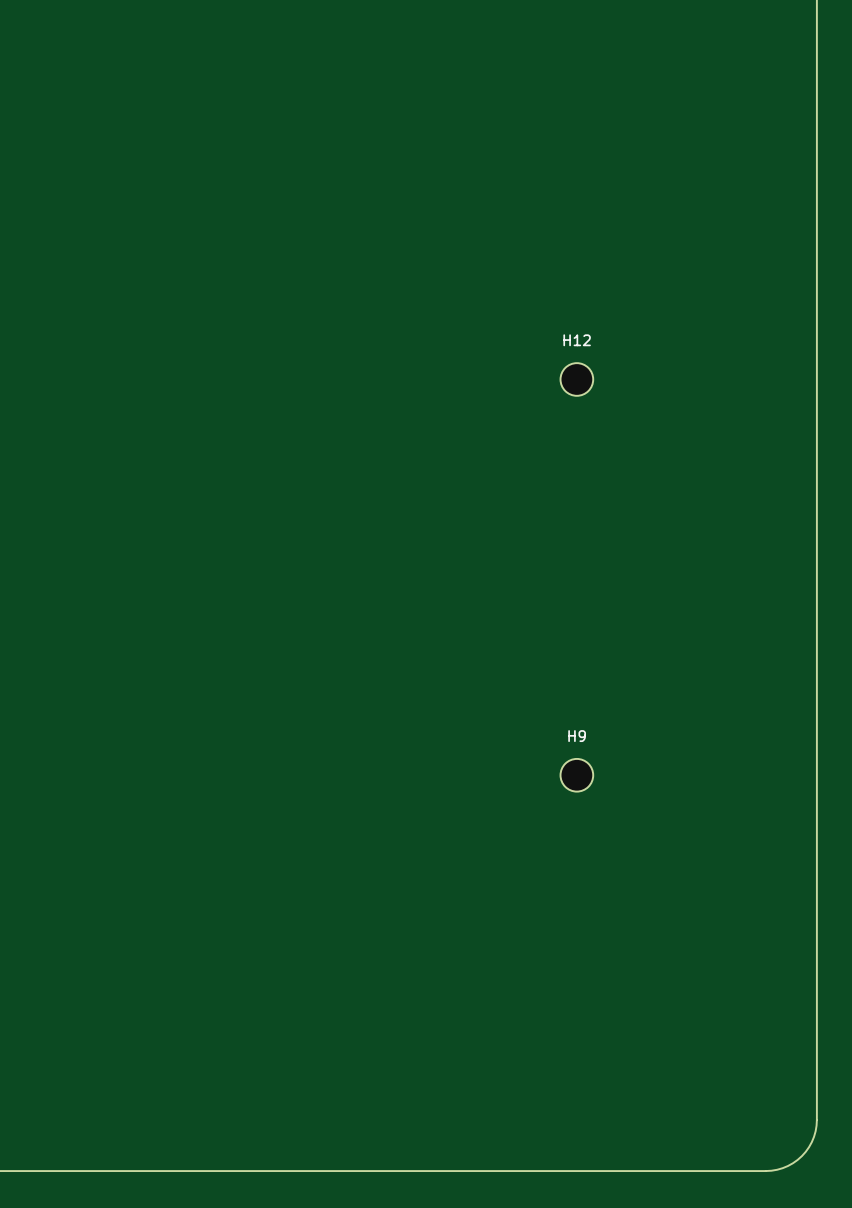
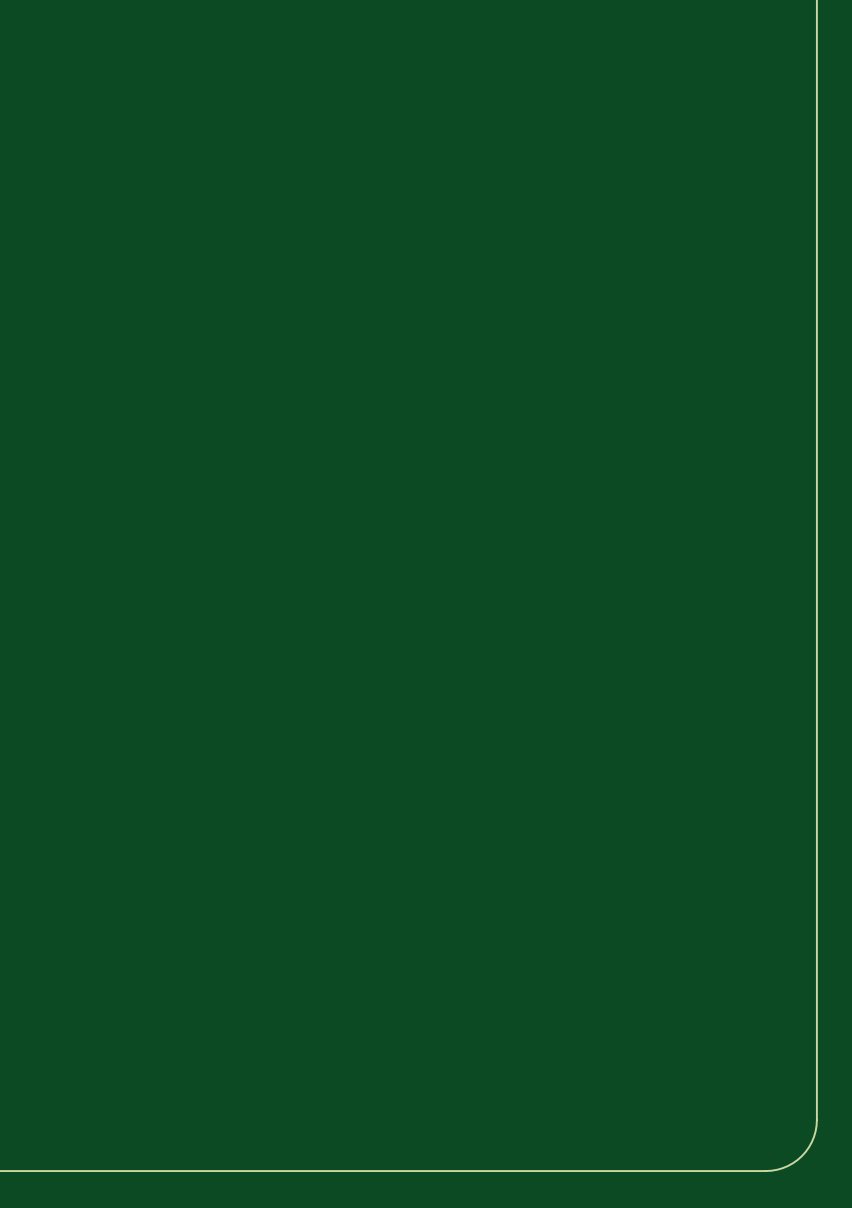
H12: (576, 379) -> none
H9: (576, 775) -> none

